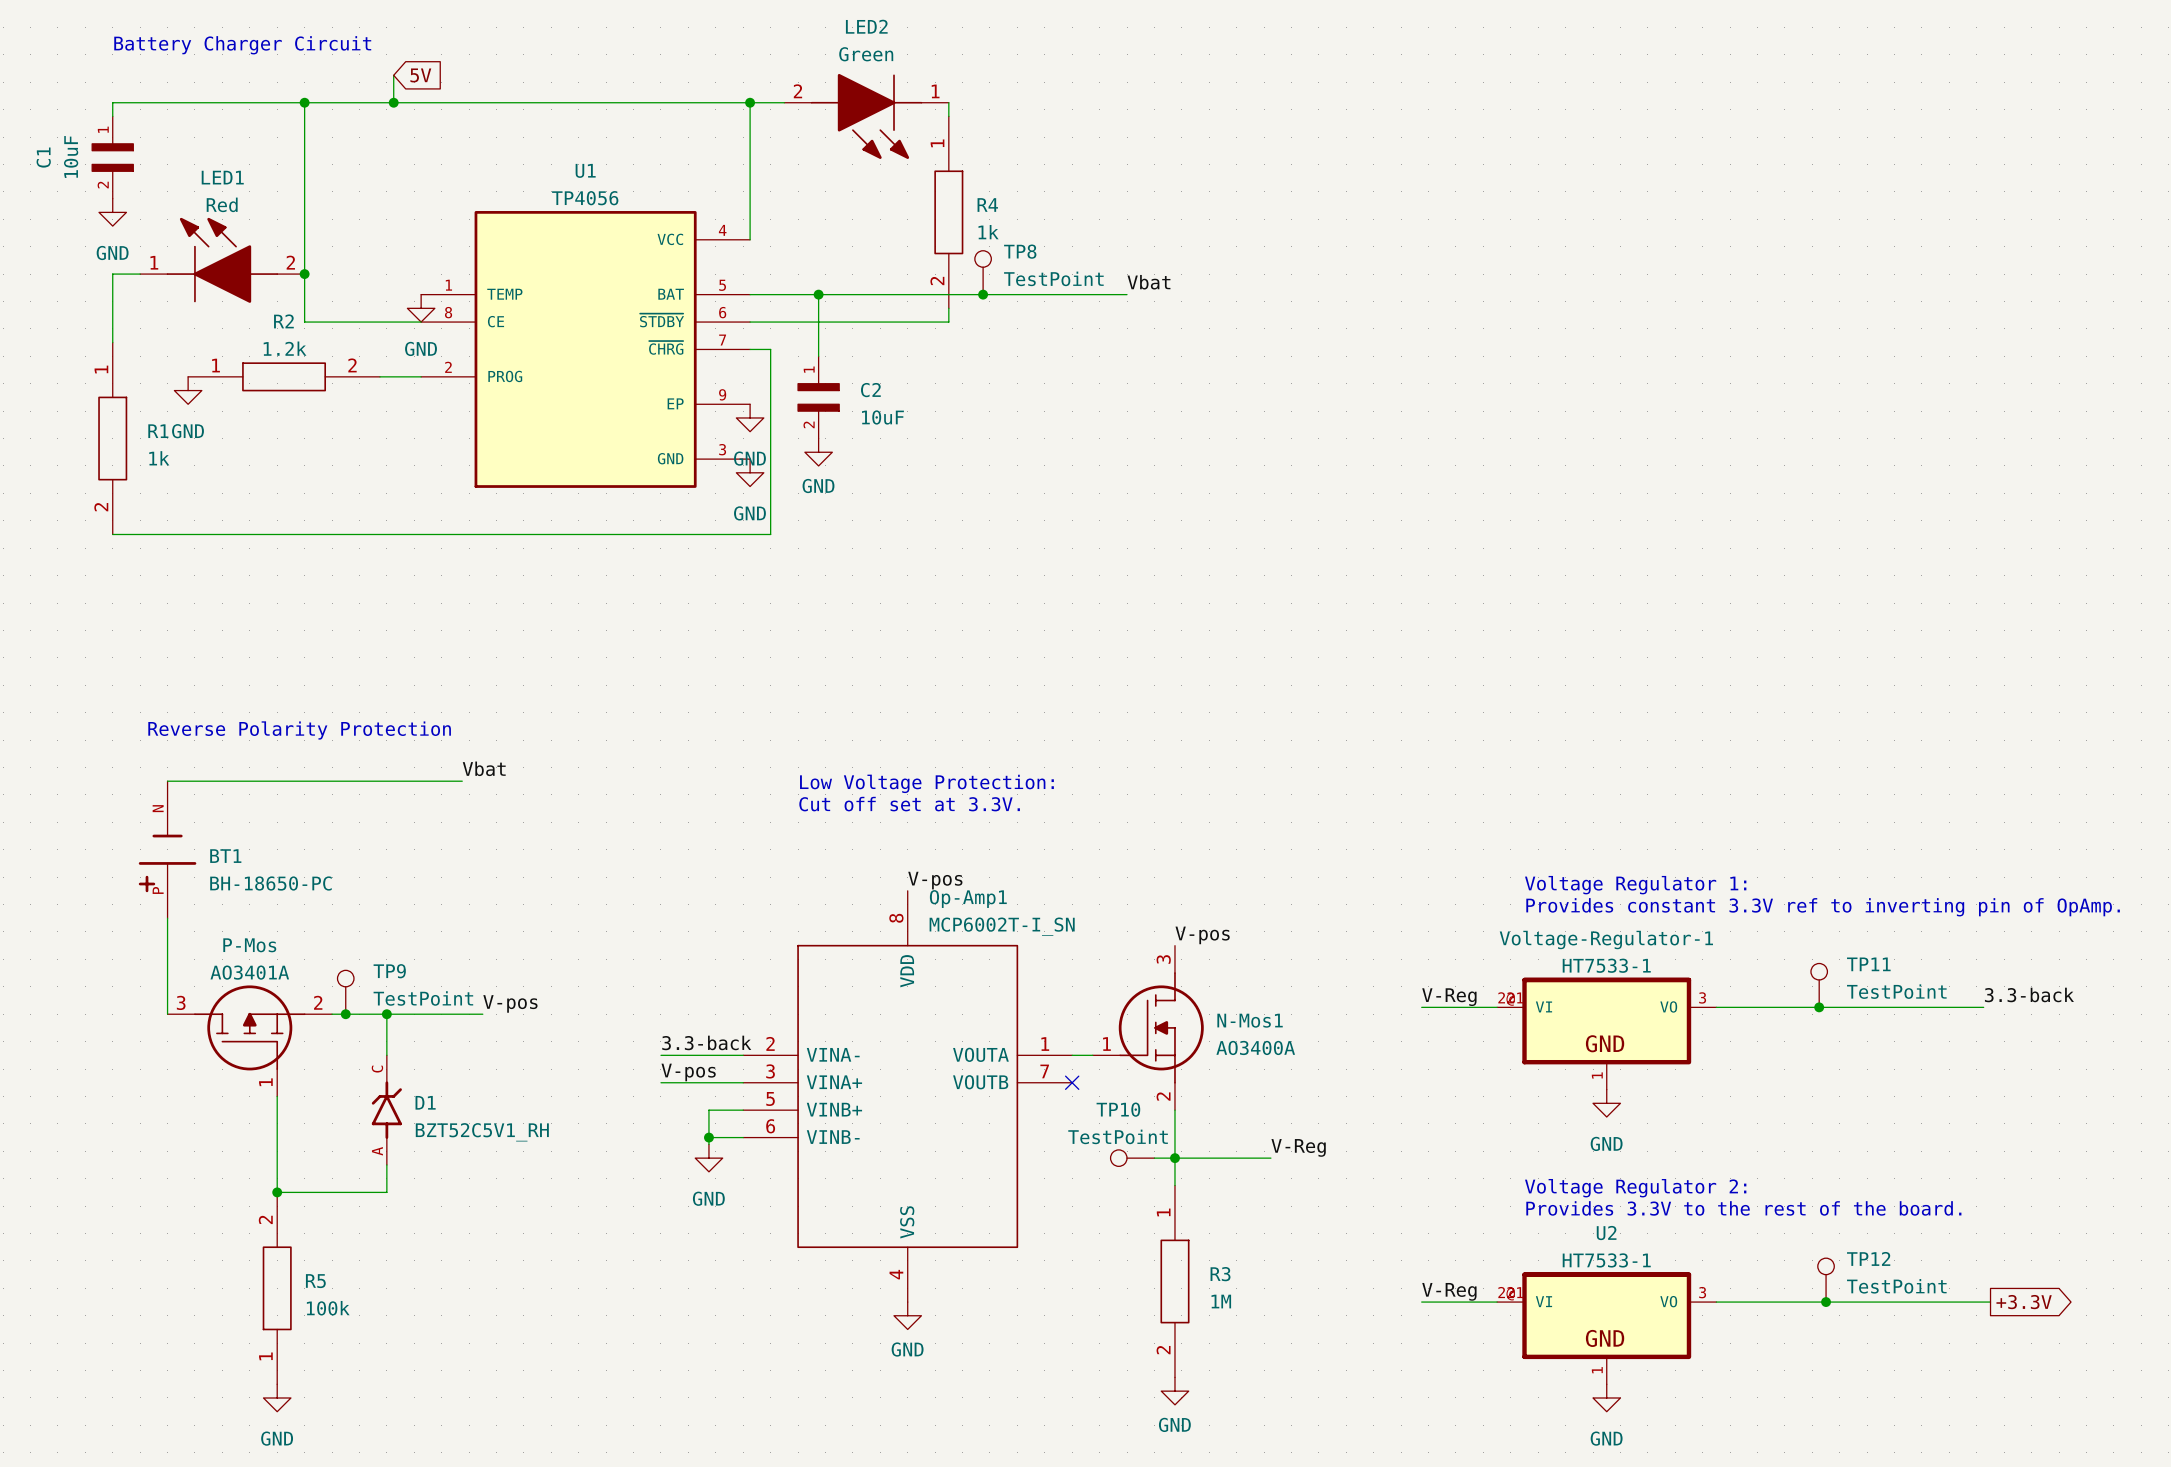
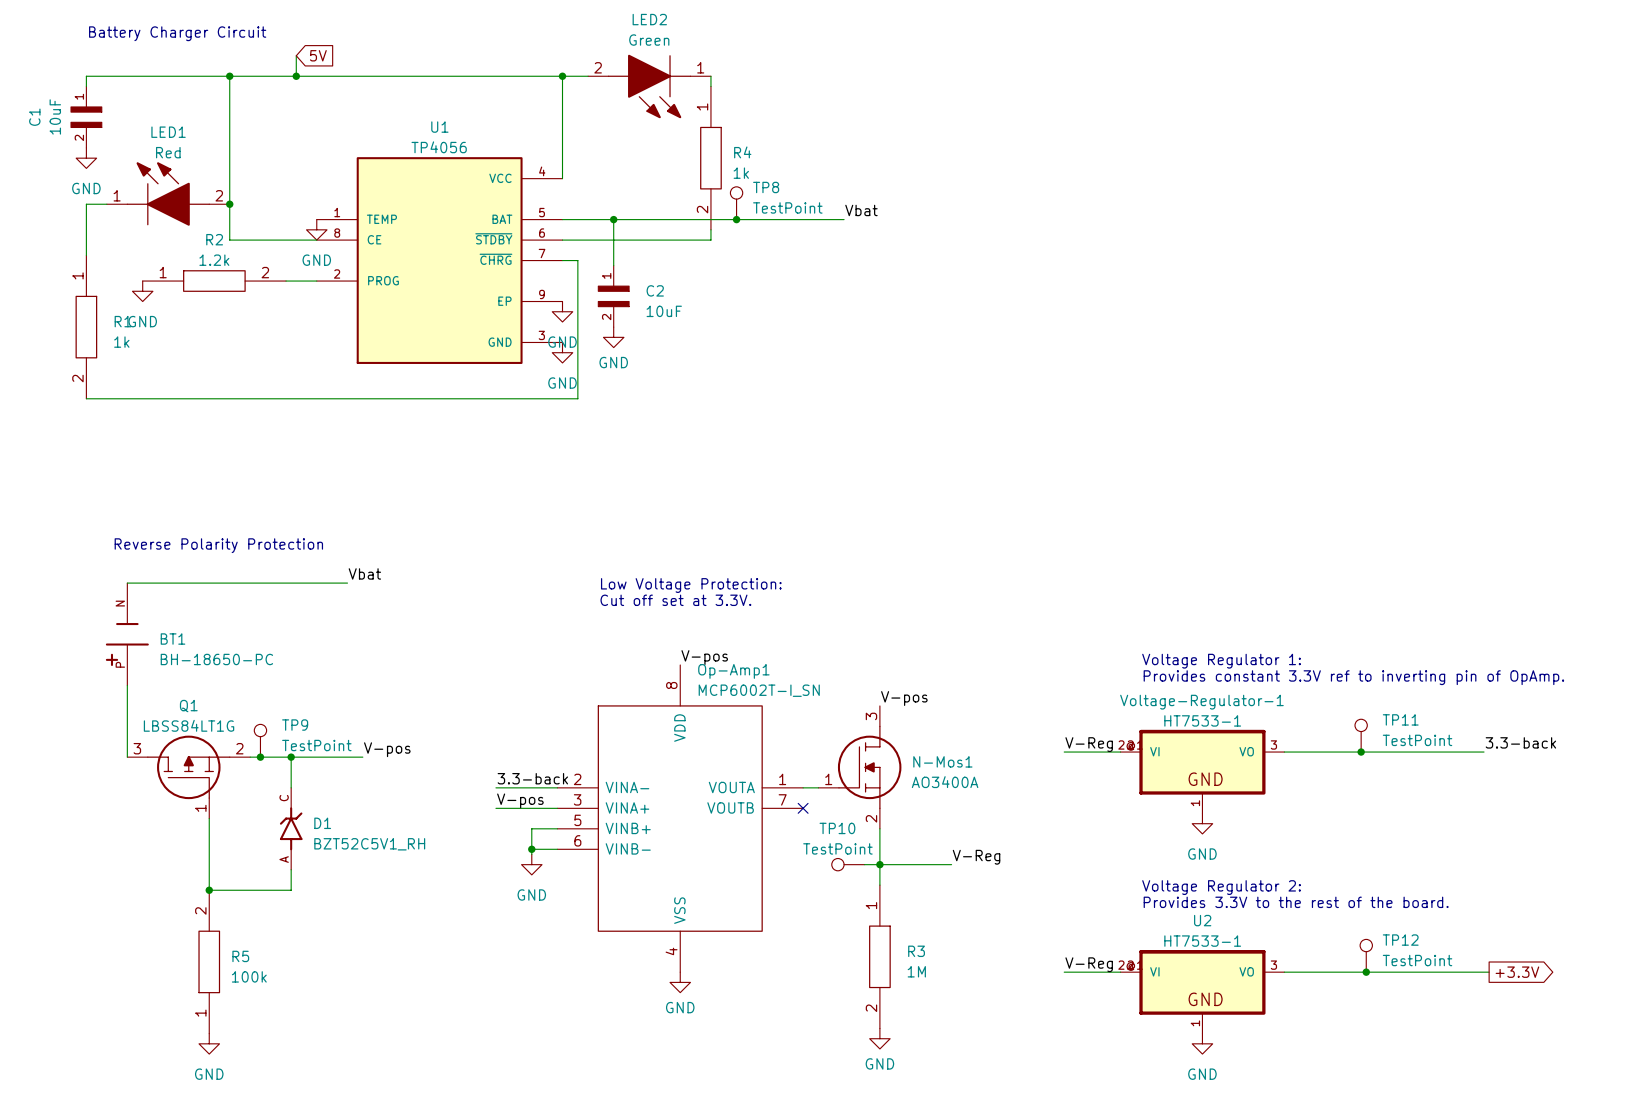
P-Mos name: P-Mos (249, 945) -> Q1 (188, 706)
P-Mos value: AO3401A (249, 972) -> LBSS84LT1G (189, 725)

